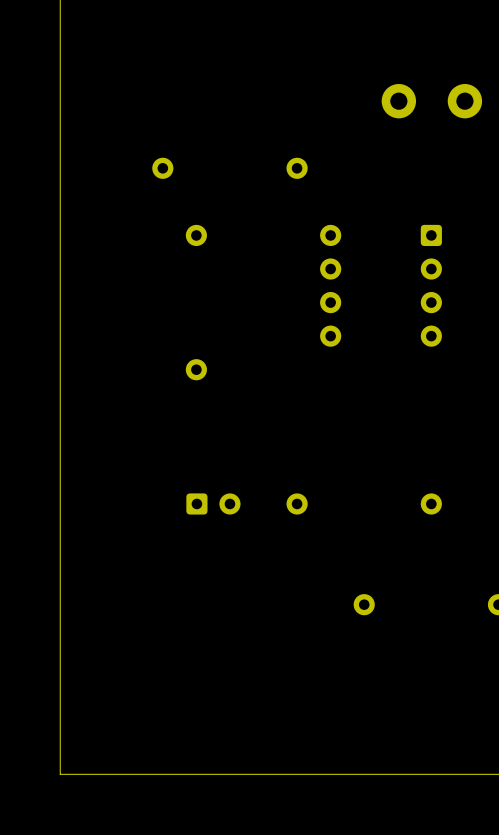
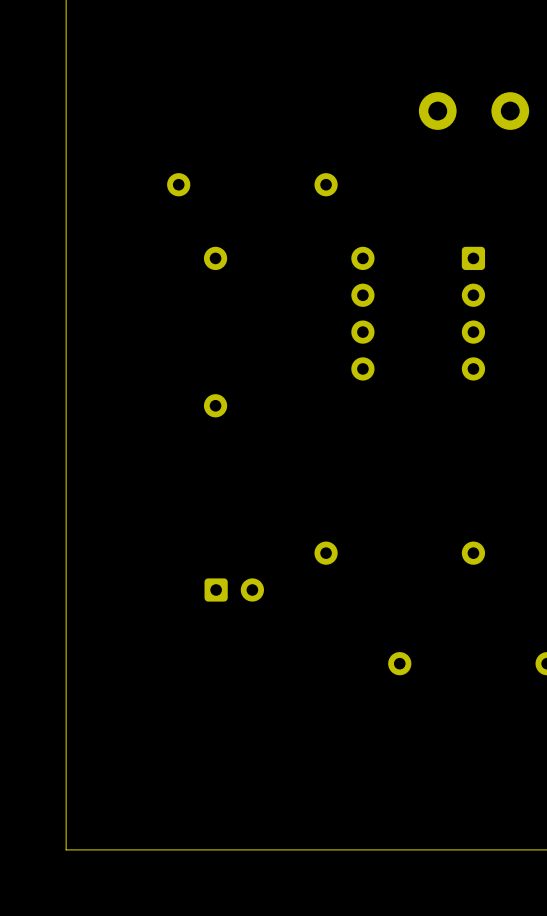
part position: (213, 503) -> (234, 589)

